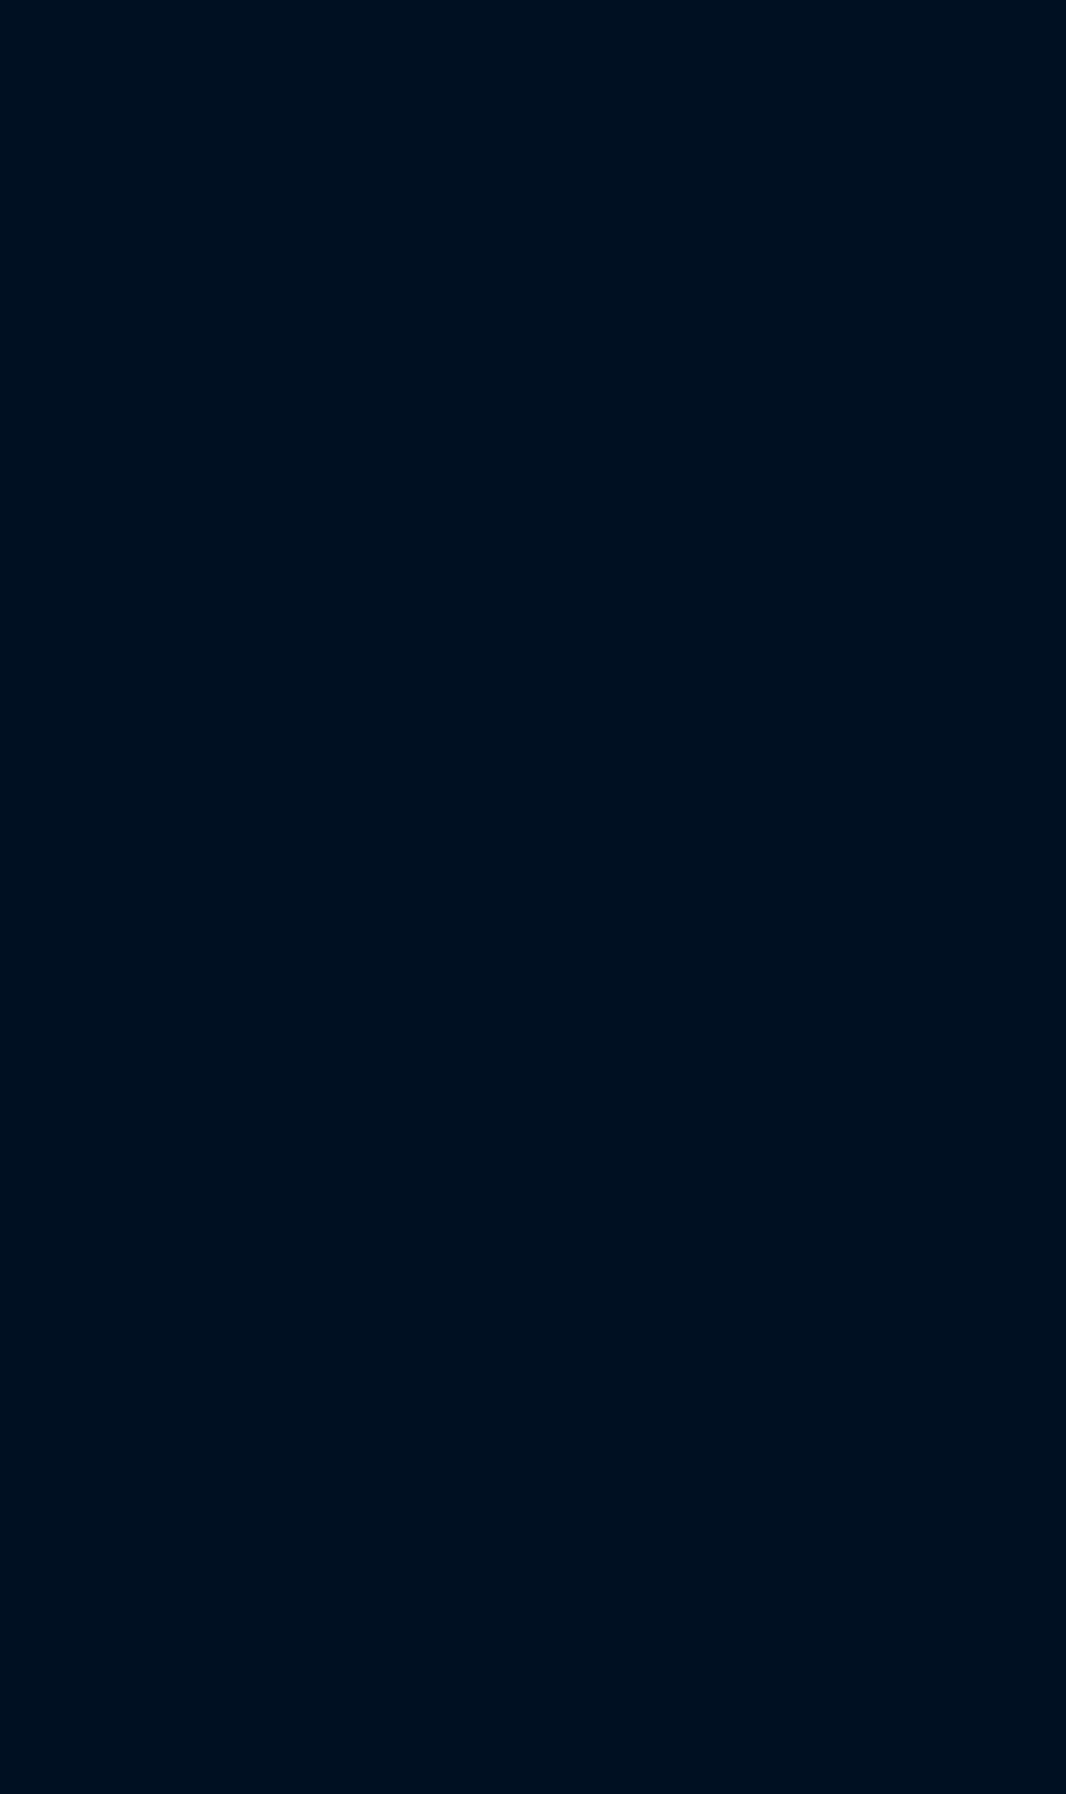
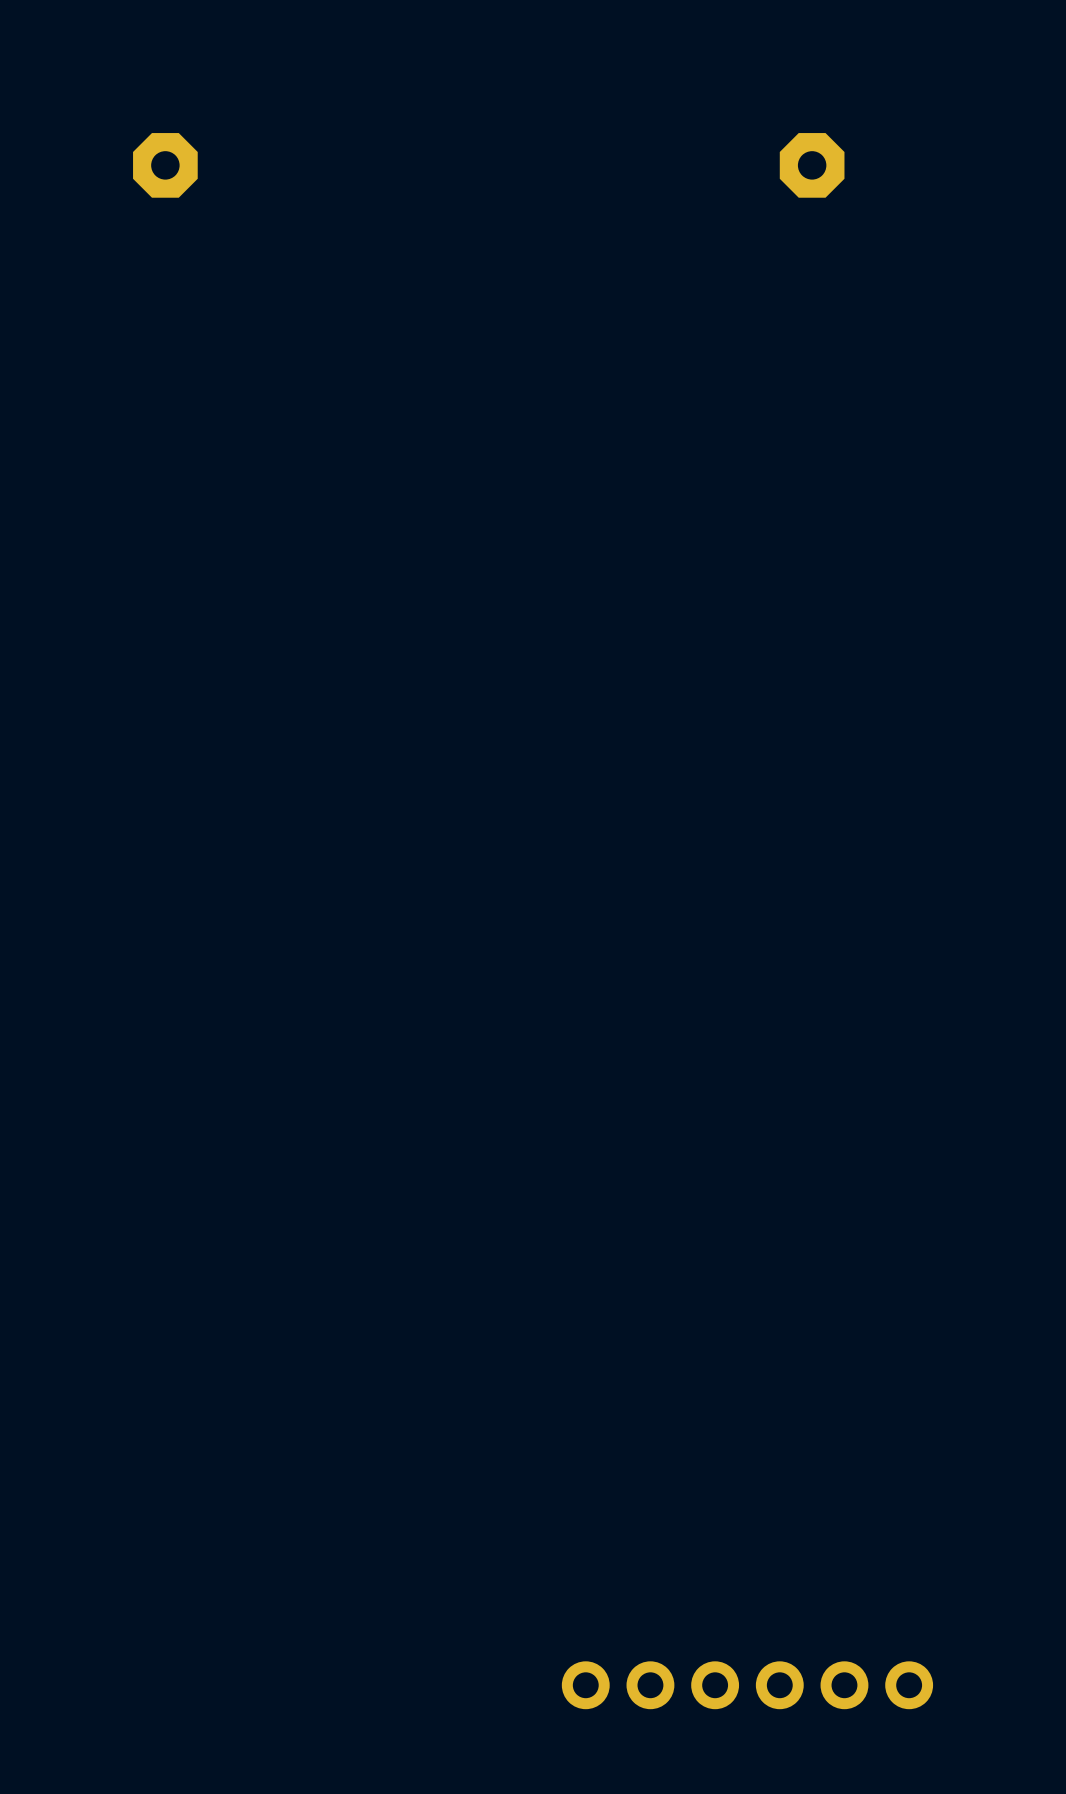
part: none -> (165, 165)
part: none -> (812, 165)
part: none -> (747, 1685)

